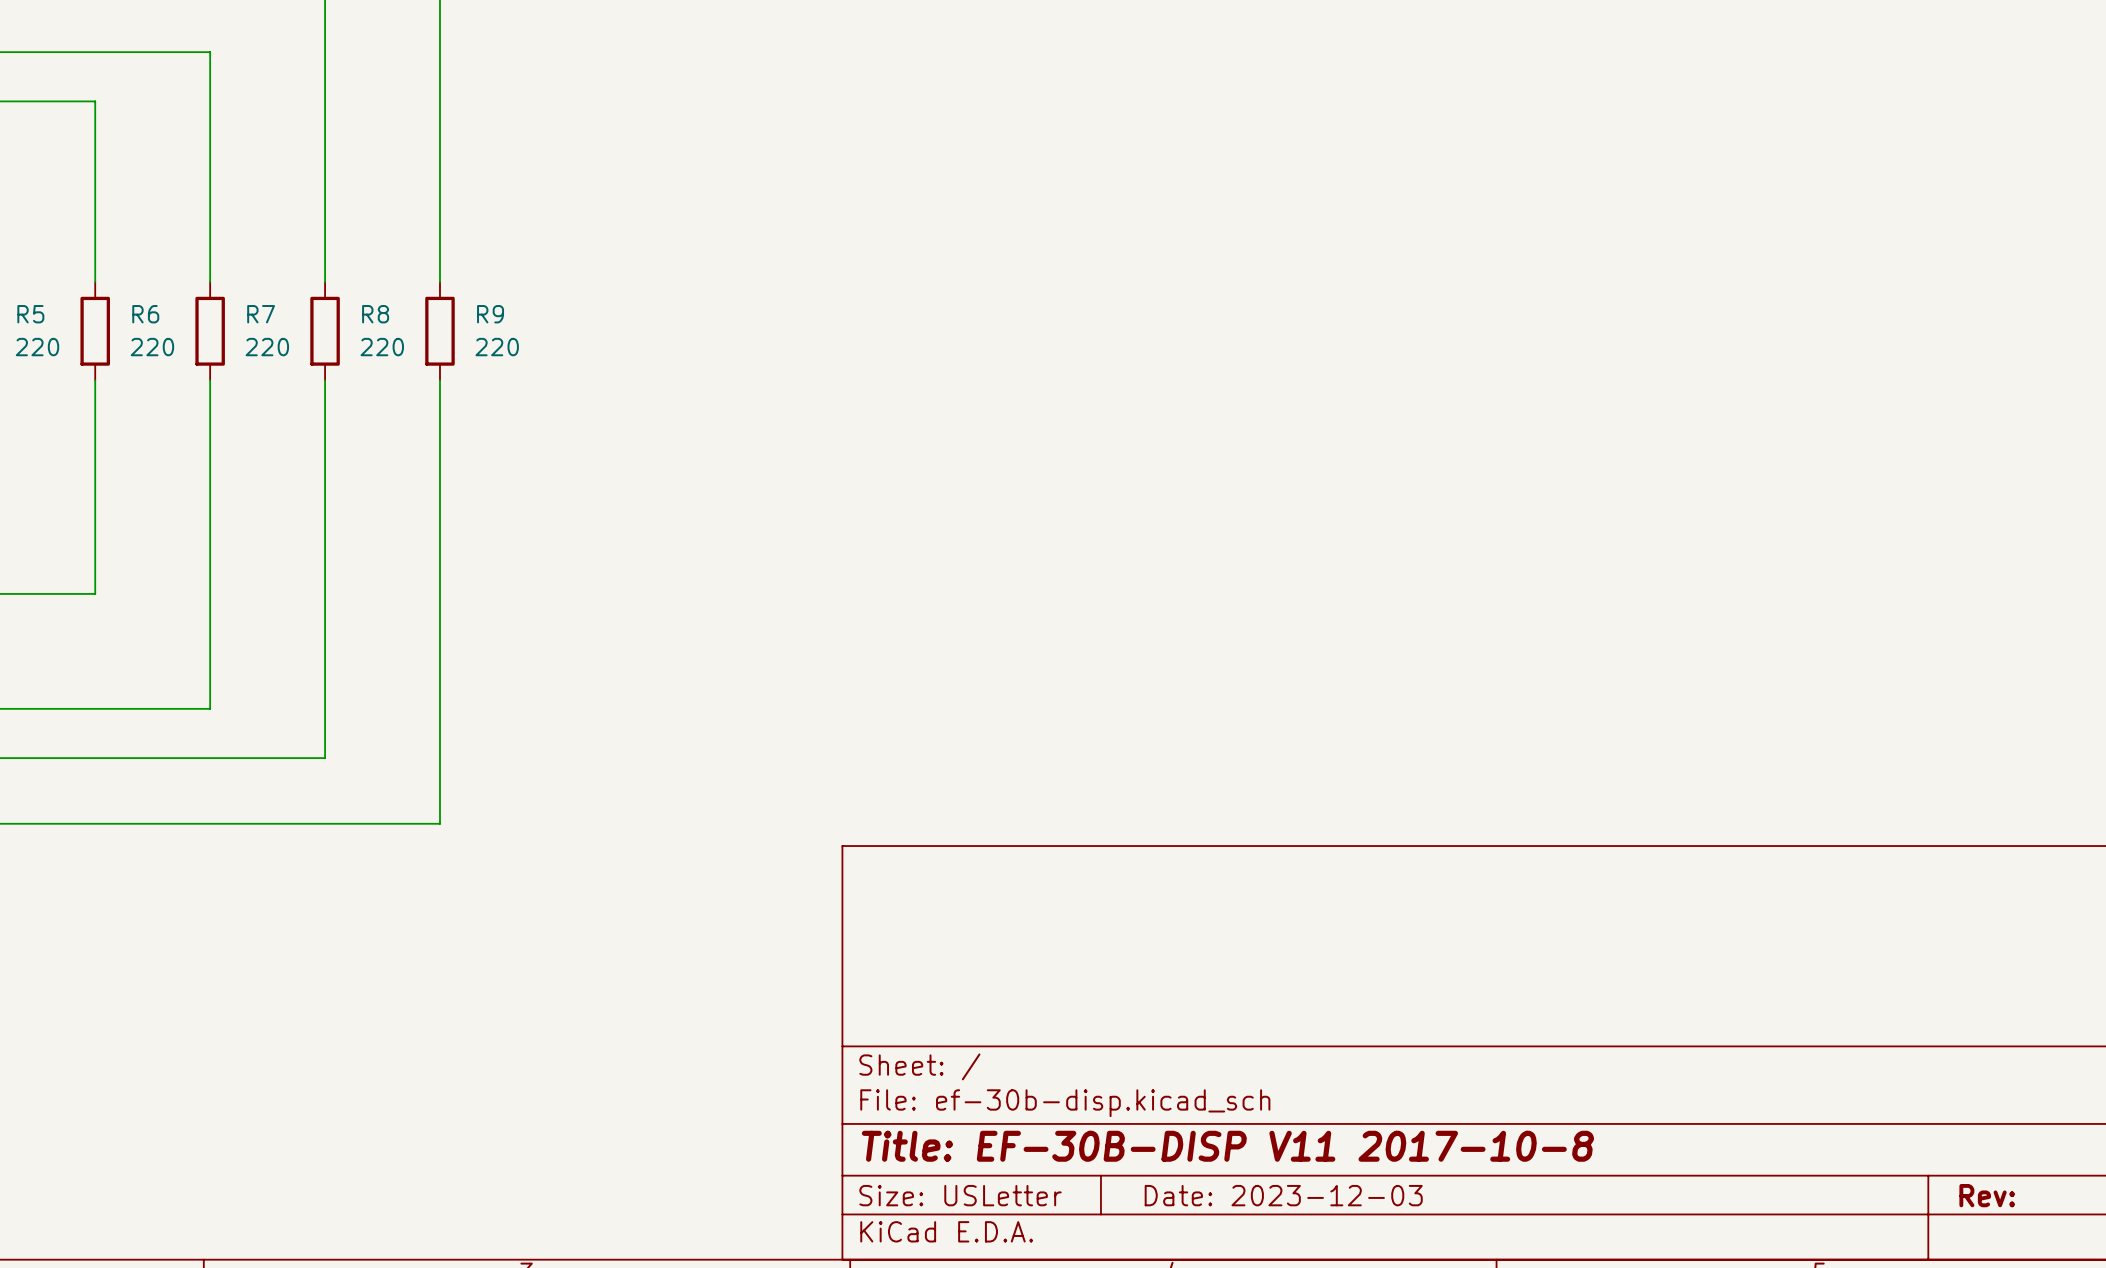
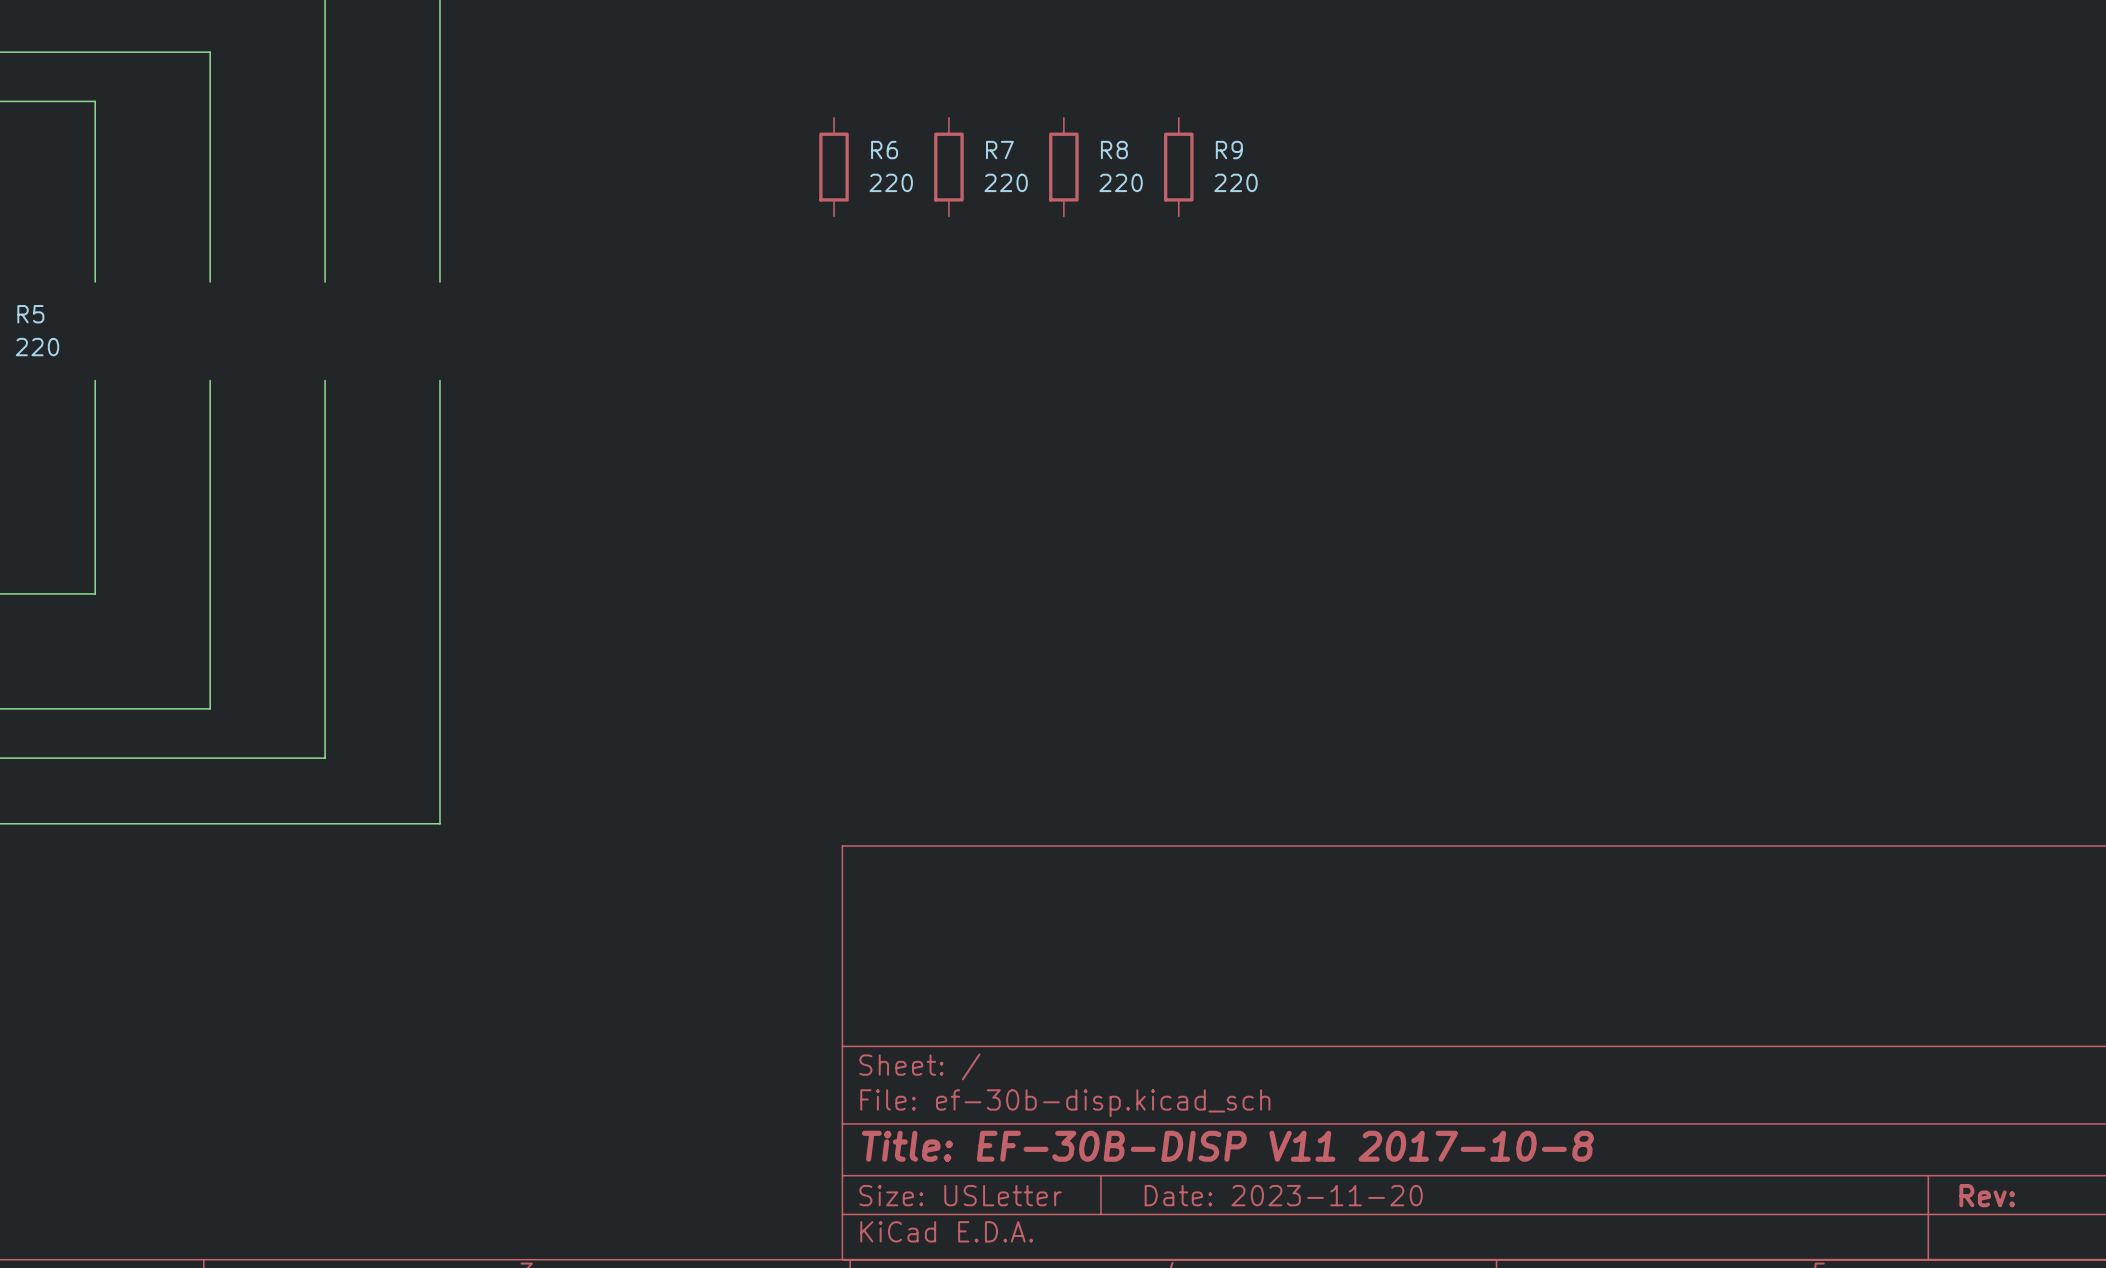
R6 position: (95, 331) -> (834, 167)
R7 position: (210, 331) -> (948, 167)
R8 position: (325, 331) -> (1063, 167)
R9 position: (439, 331) -> (1178, 167)
title block: Date: 2023-12-03 (1283, 1195) -> Date: 2023-11-20 (1283, 1195)

